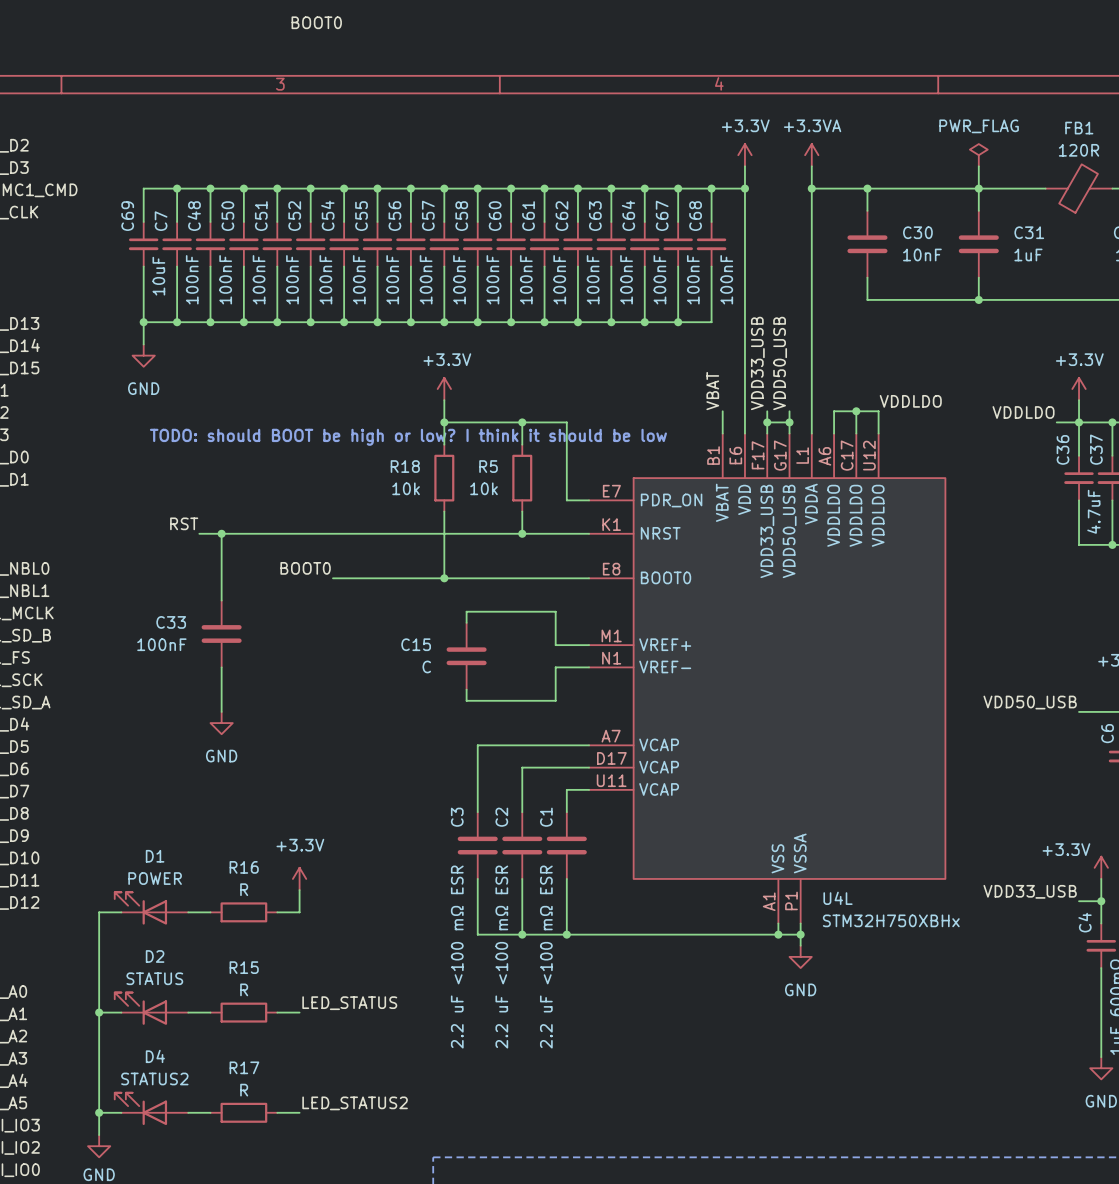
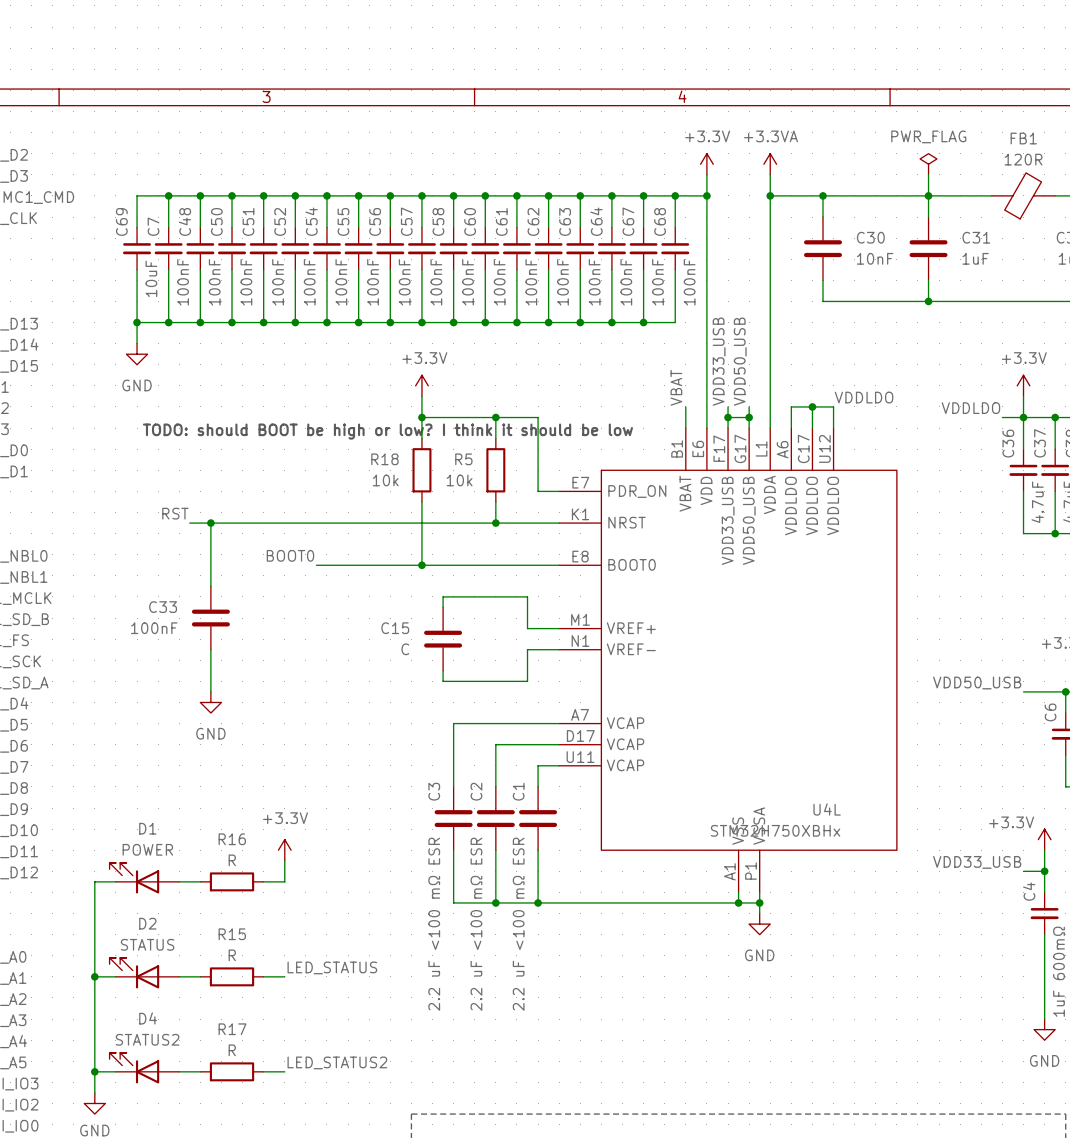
label: BOOT0 (316, 22) -> none
U4L name position: U4L (838, 898) -> U4L (827, 809)
U4L value position: STM32H750XBHx (891, 920) -> STM32H750XBHx (775, 830)

